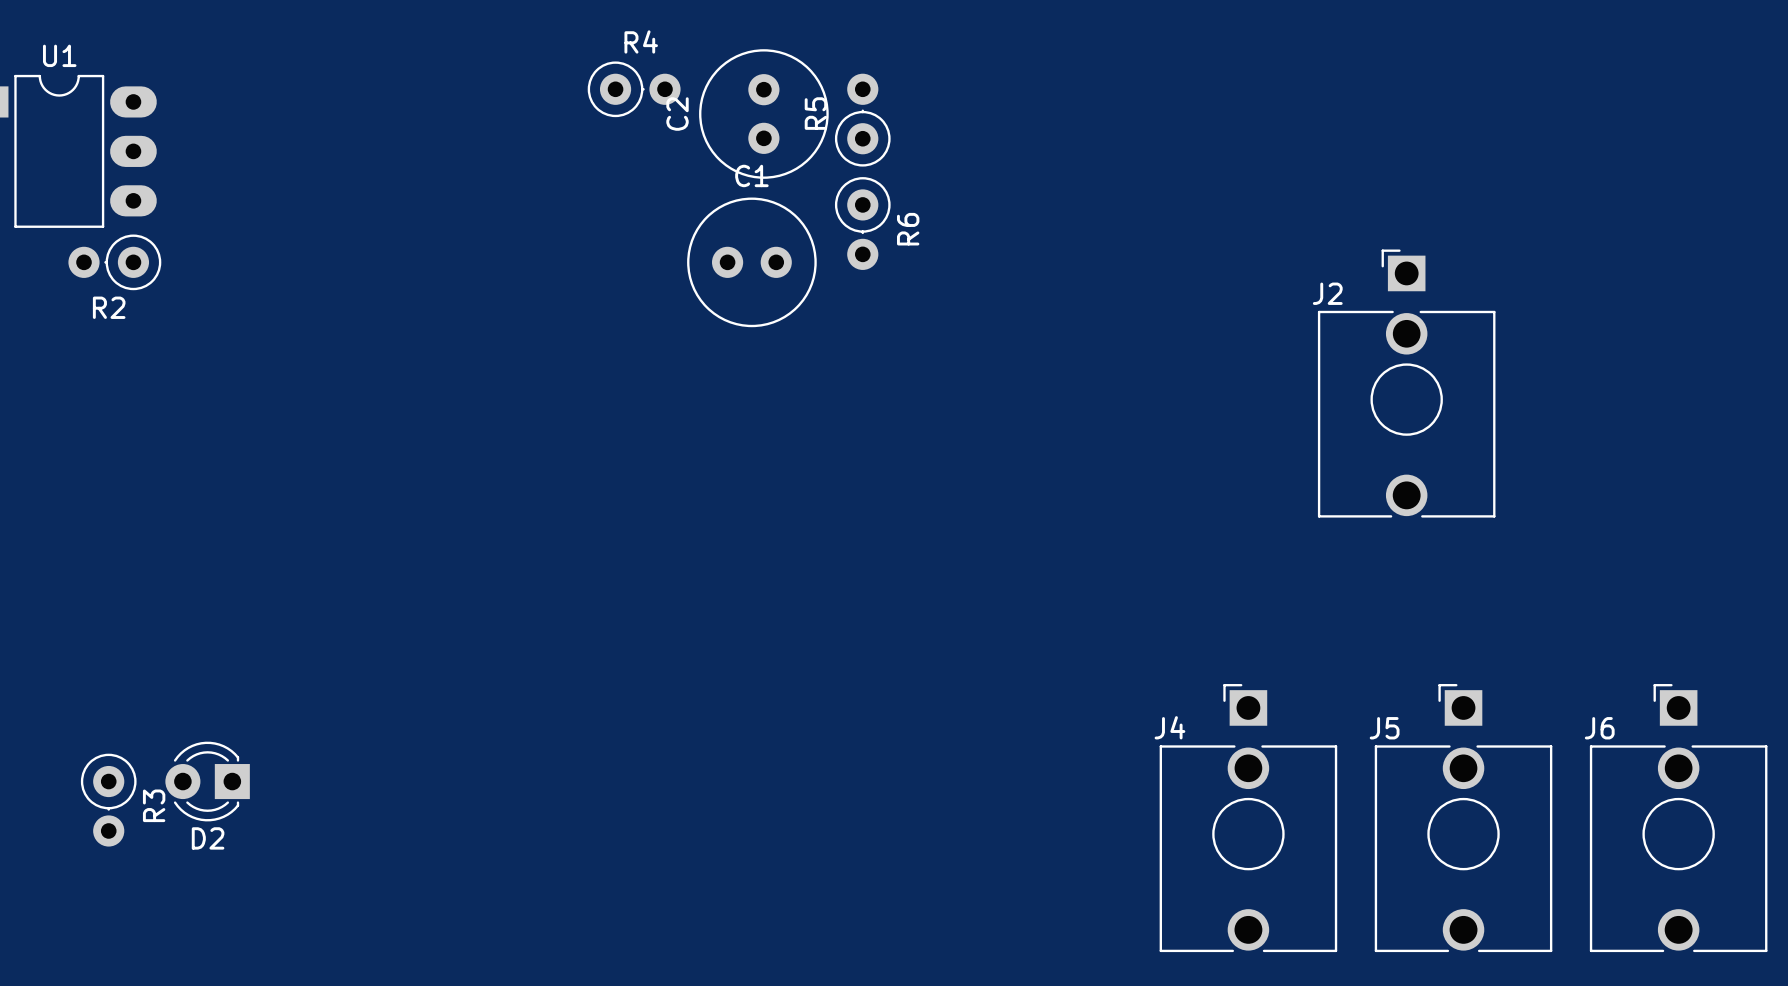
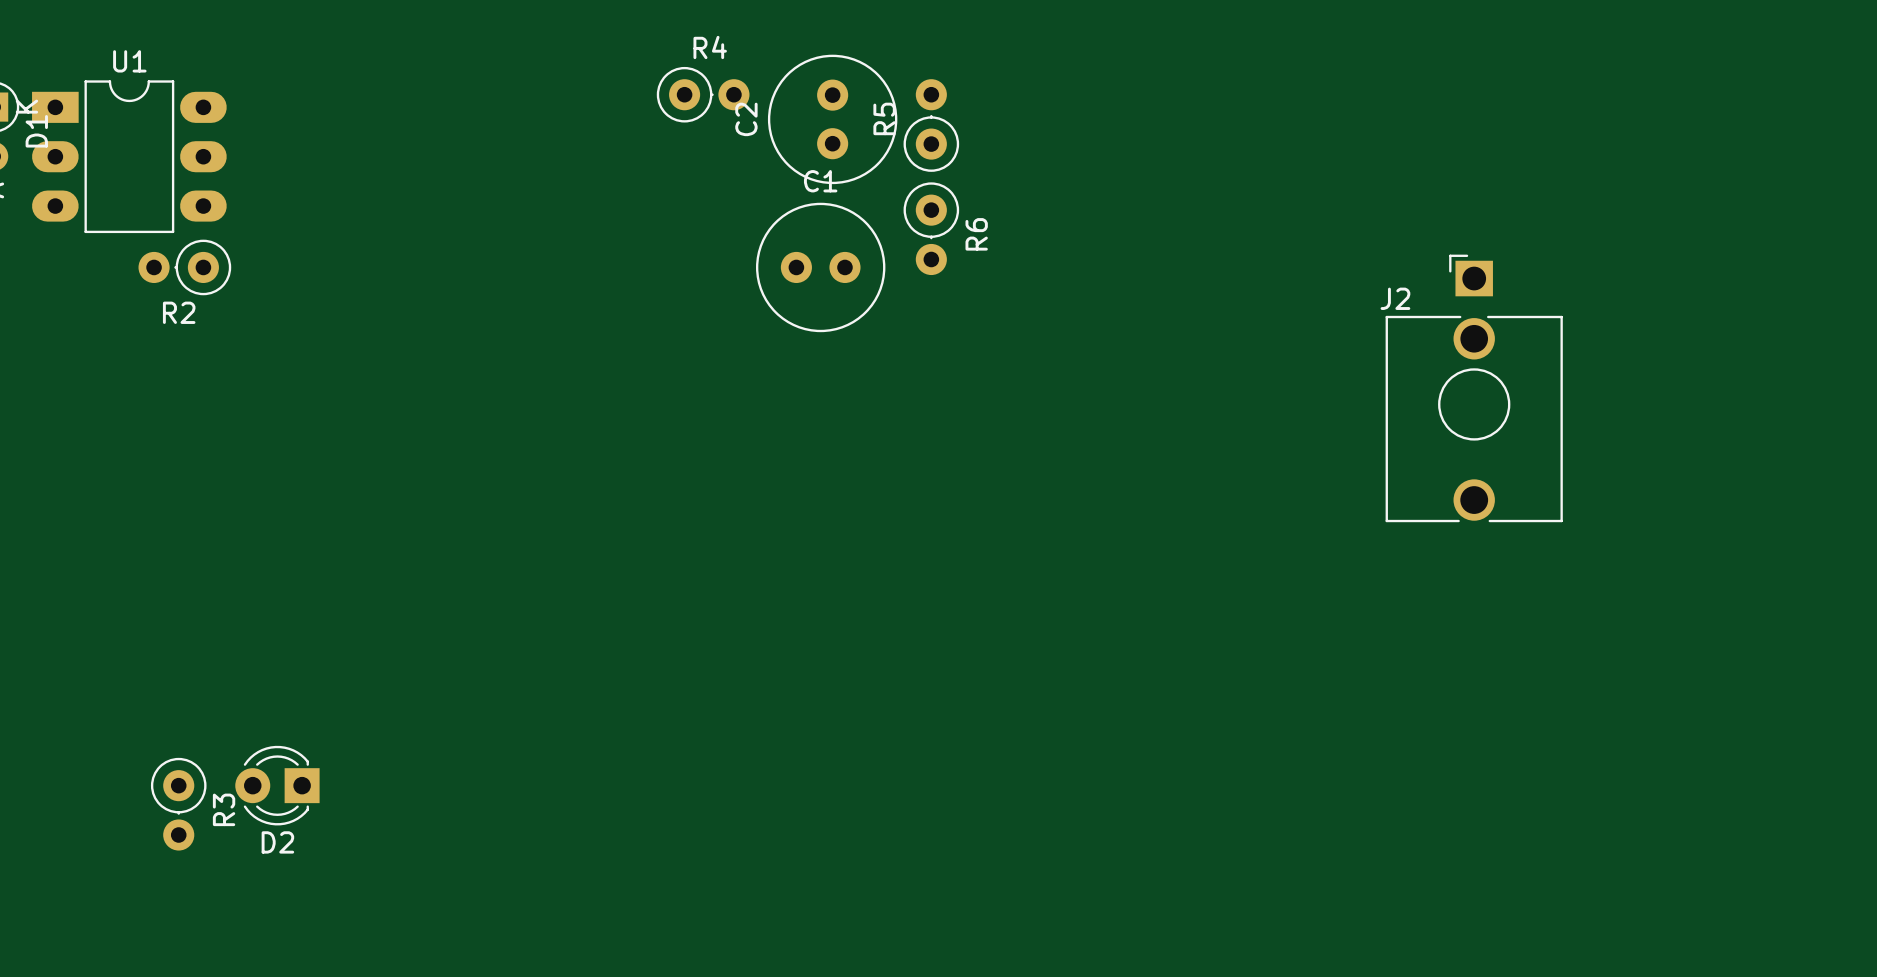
J4: (1248, 818) -> none
J5: (1463, 818) -> none
J6: (1678, 818) -> none

